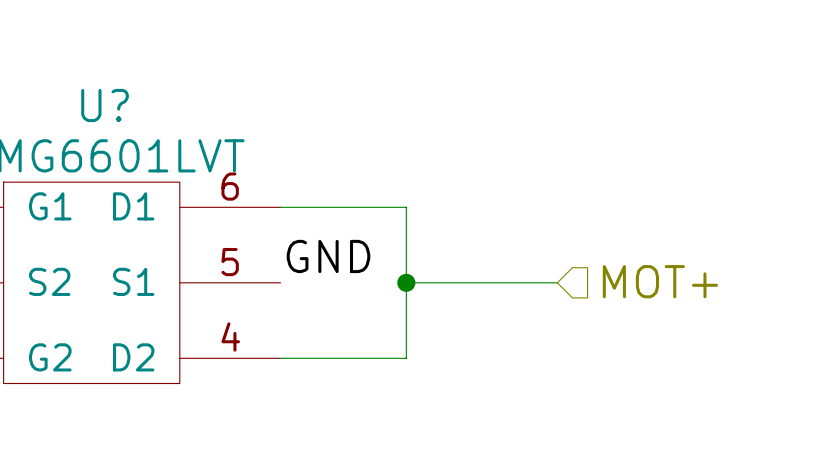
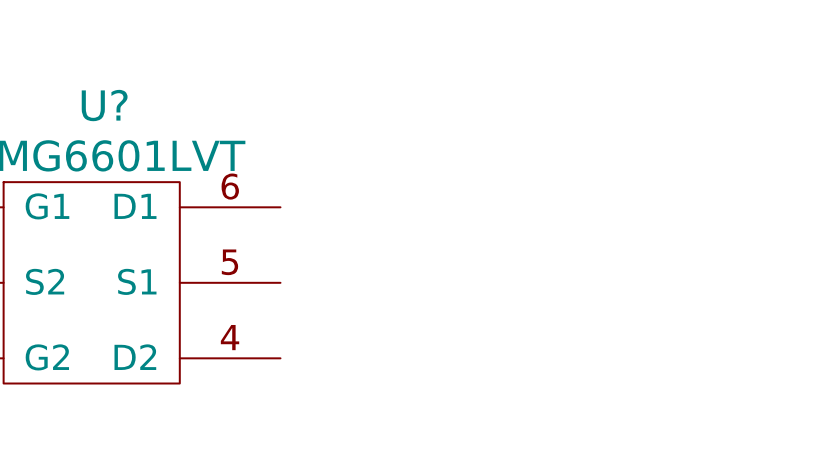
wire: (280, 207) (406, 207) (406, 358) (280, 358) -> none
label: GND (328, 256) -> none
hierarchical label: MOT+ (660, 281) -> none
wire: (406, 282) (557, 282) -> none
junction: (406, 282) -> none

